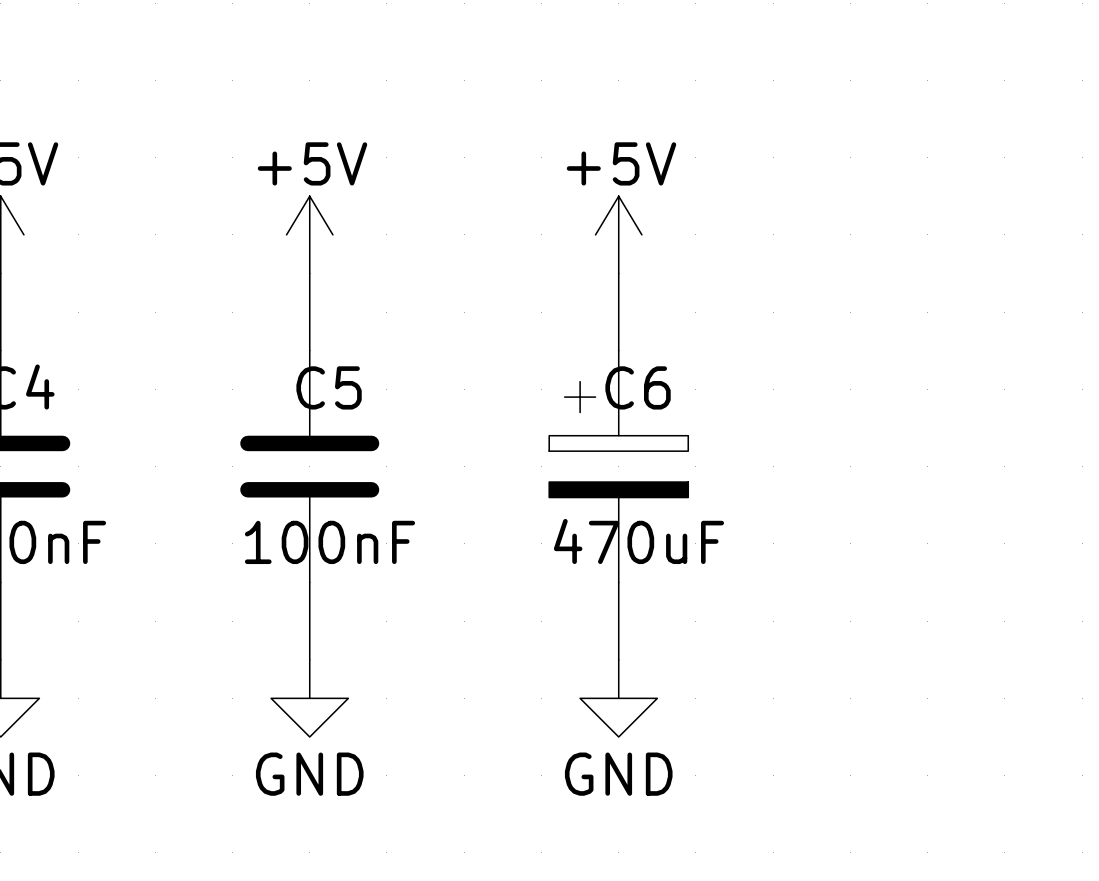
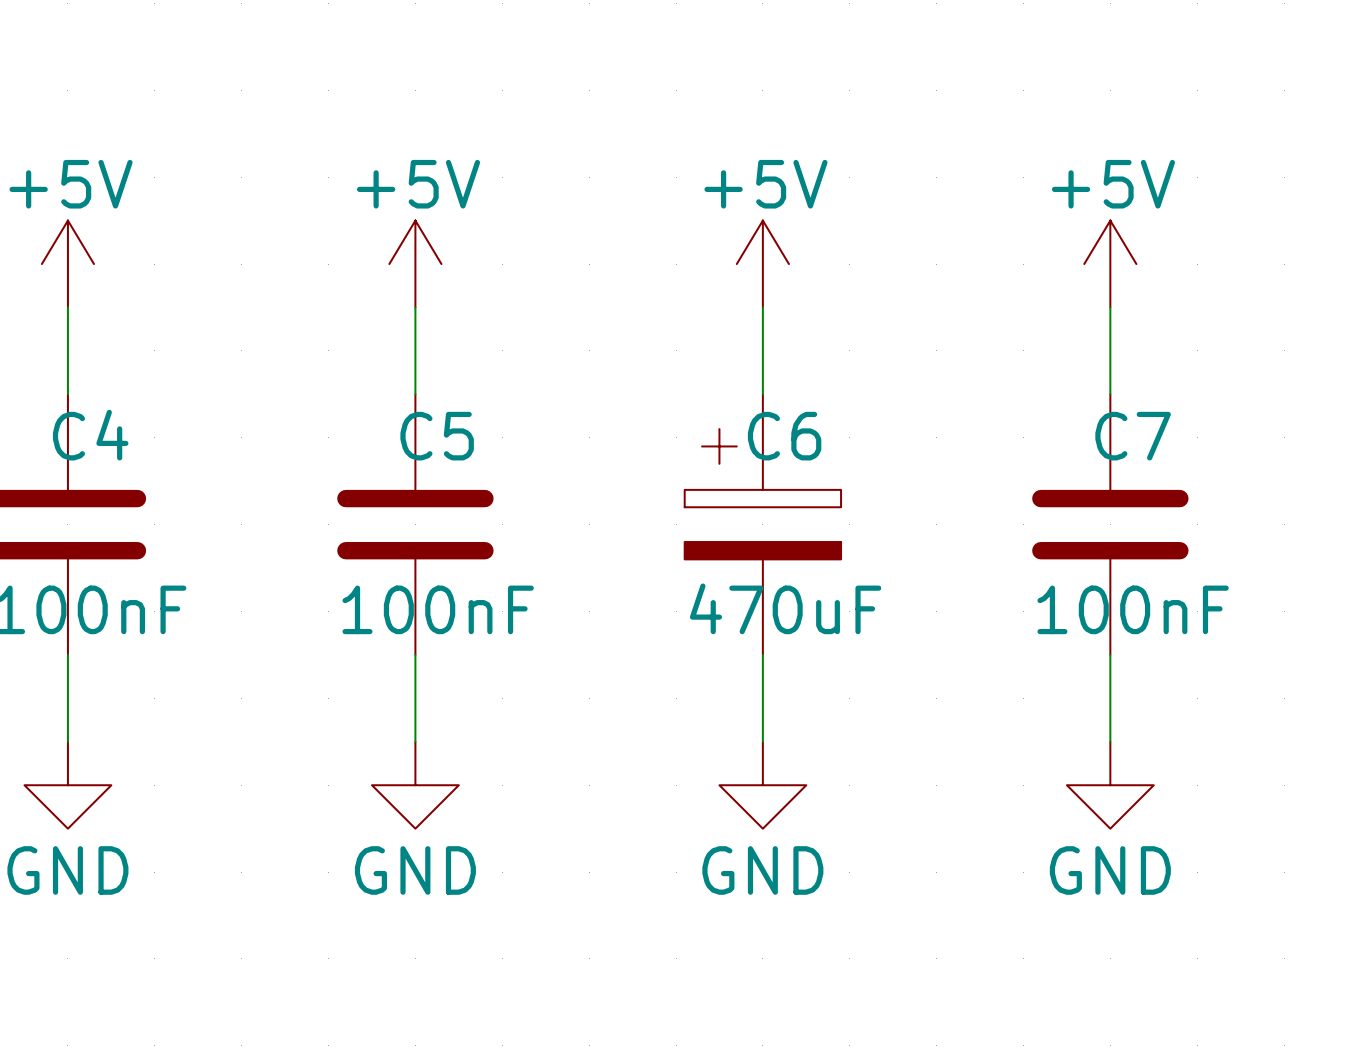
power symbol: none -> +5V (1110, 264)
wire: none -> (1110, 307) (1110, 394)
C7: none -> 100nF (1110, 524)
wire: none -> (1110, 654) (1110, 741)
power symbol: none -> GND (1110, 785)

